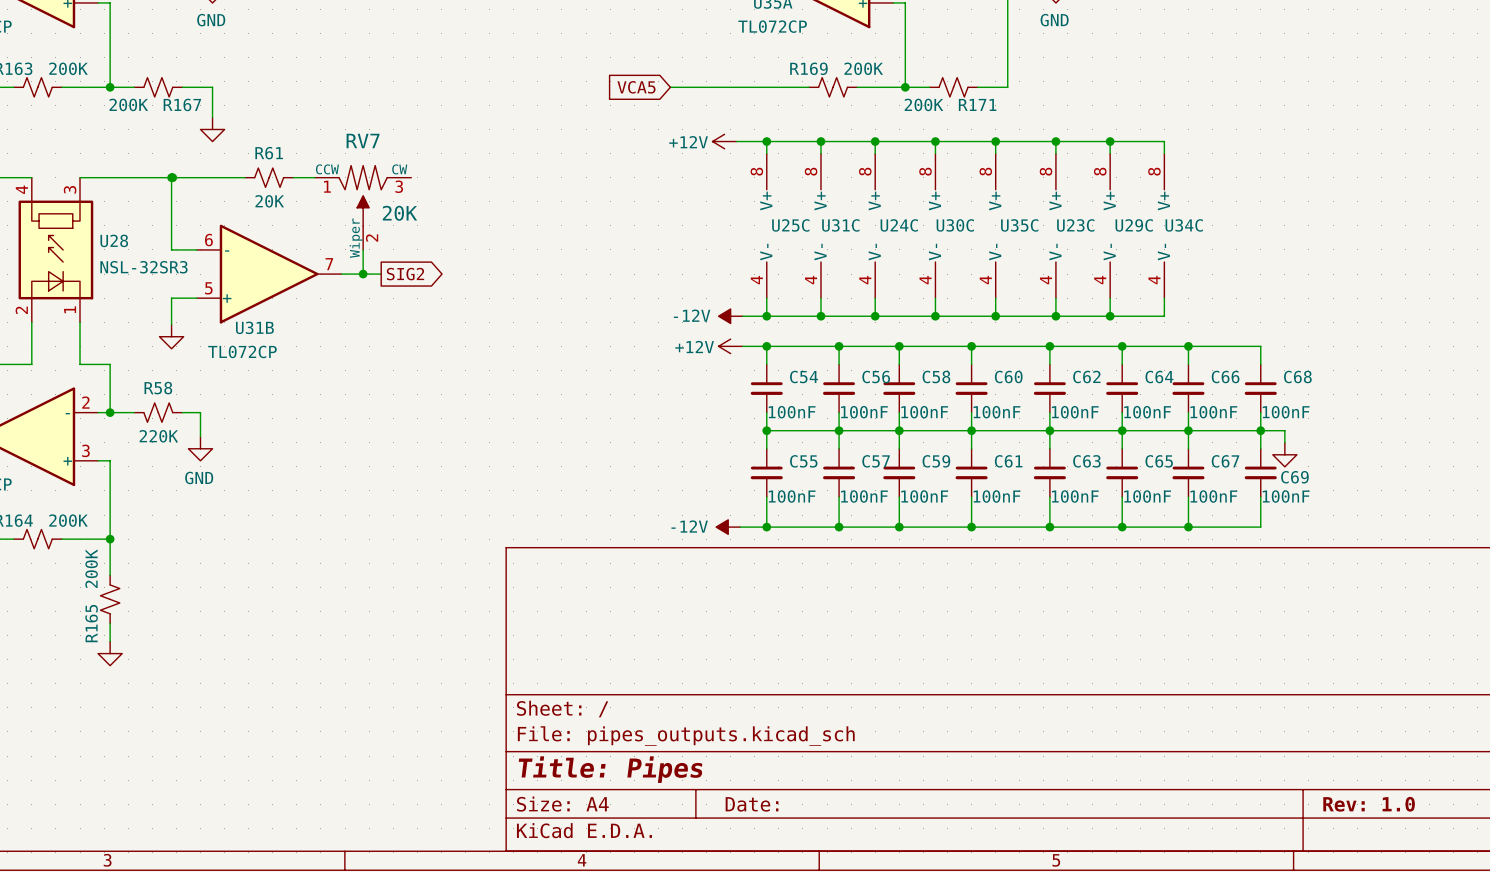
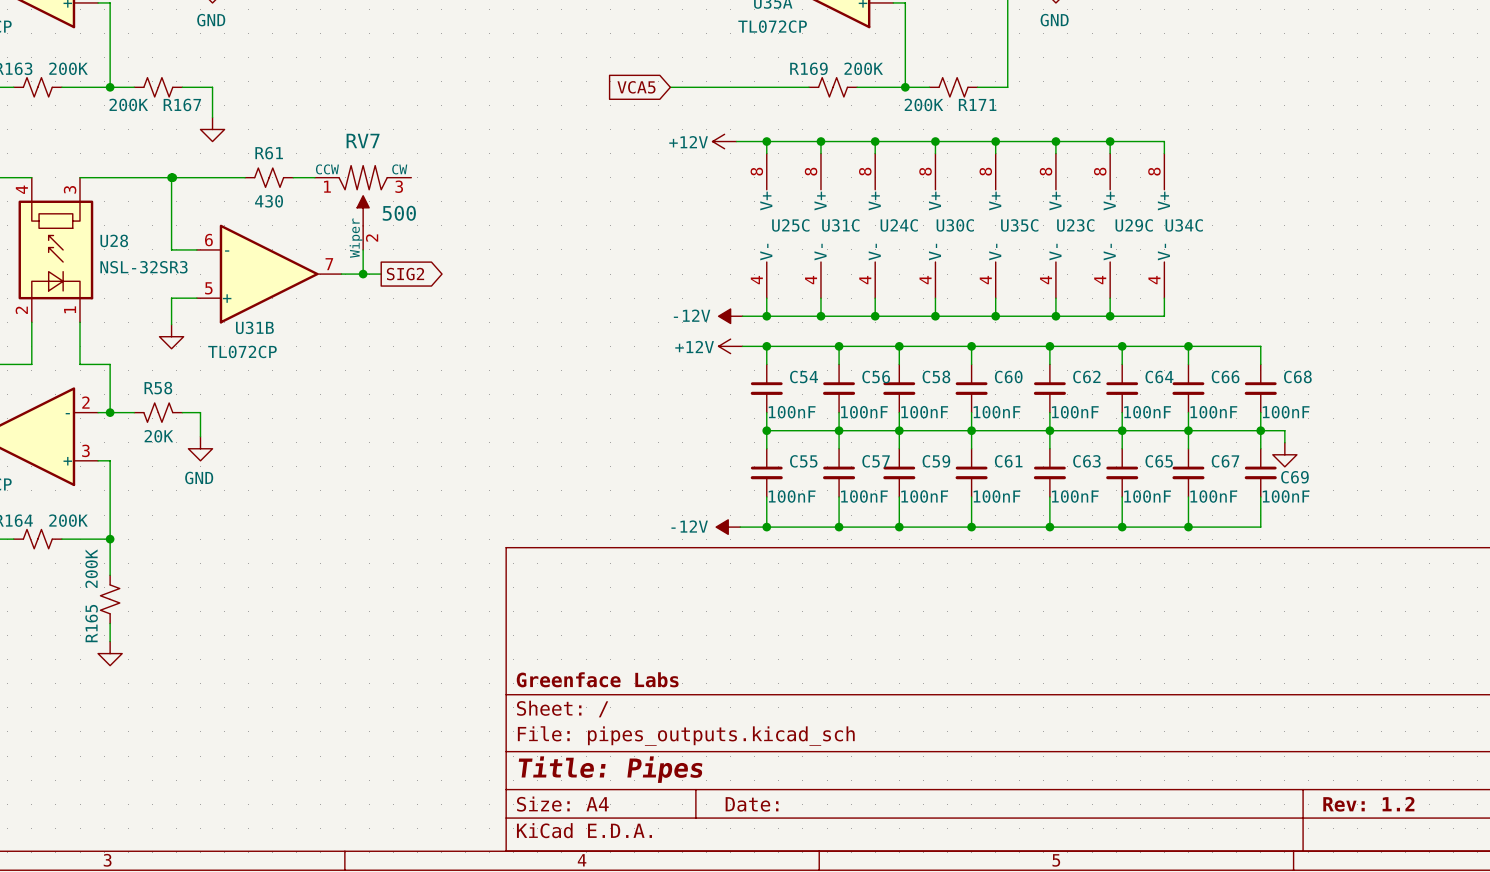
R61 value: 20K (269, 201) -> 430 (269, 201)
RV7 value: 20K (399, 213) -> 500 (399, 213)
R58 value: 220K (158, 436) -> 20K (158, 436)
title block: none -> Greenface Labs (597, 679)
title block: Rev: 1.0 (1369, 804) -> Rev: 1.2 (1368, 804)

